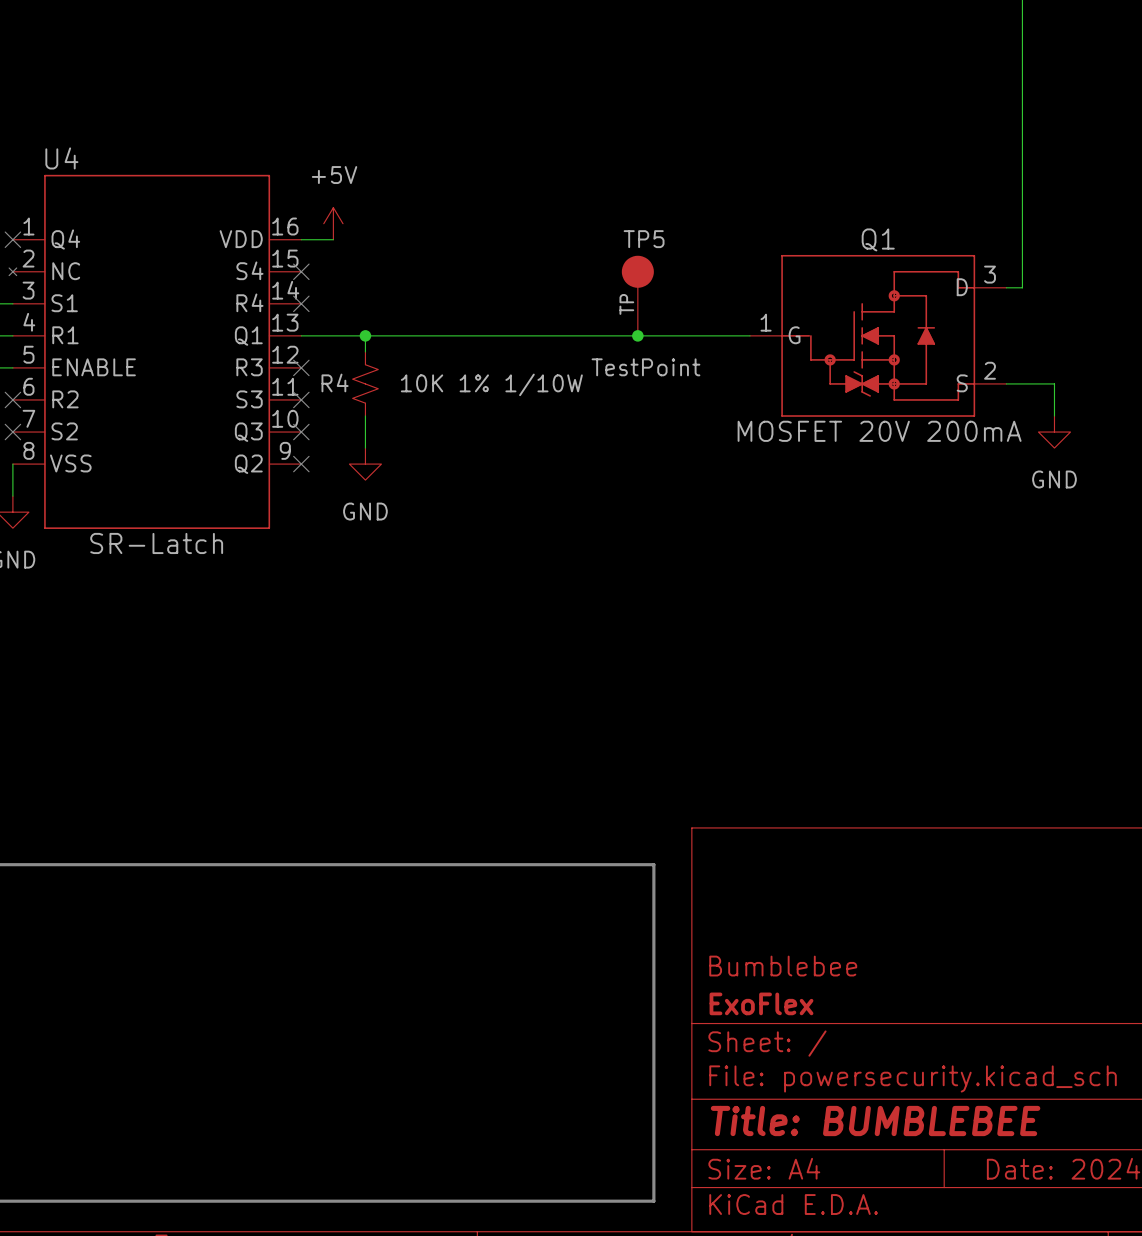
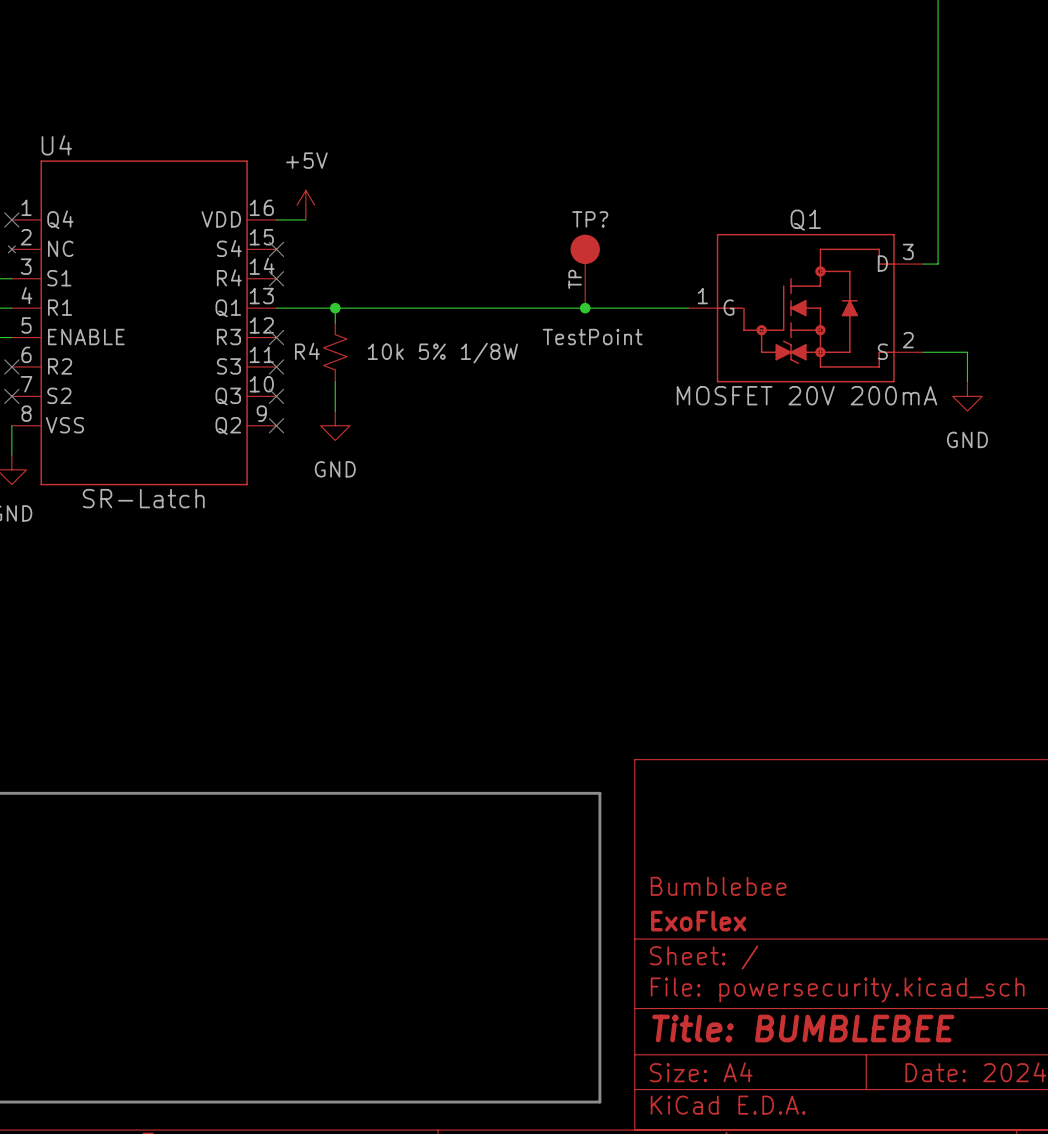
TP5 name: TP5 (644, 239) -> TP? (590, 219)
R4 value: 10K 1% 1/10W (491, 384) -> 10k 5% 1/8W (442, 353)

